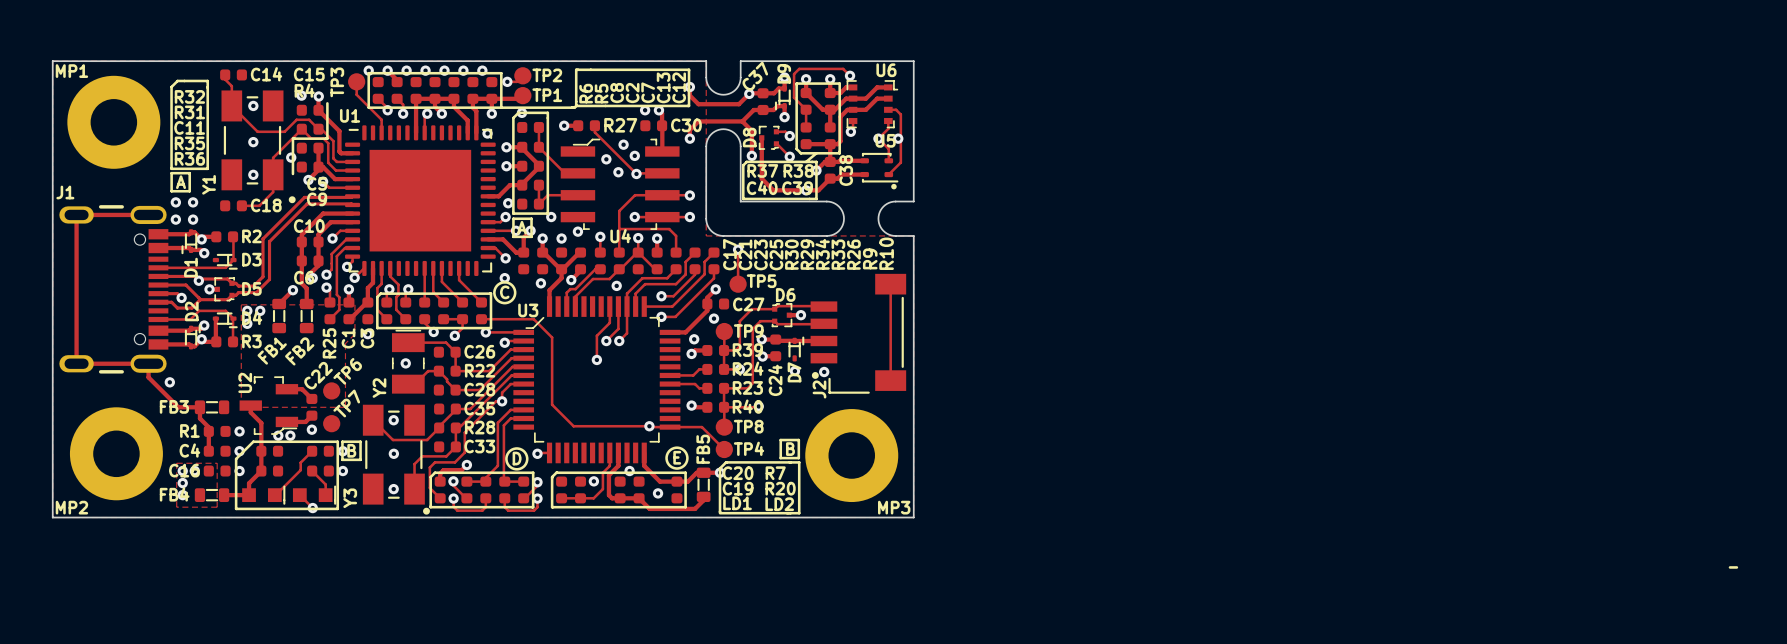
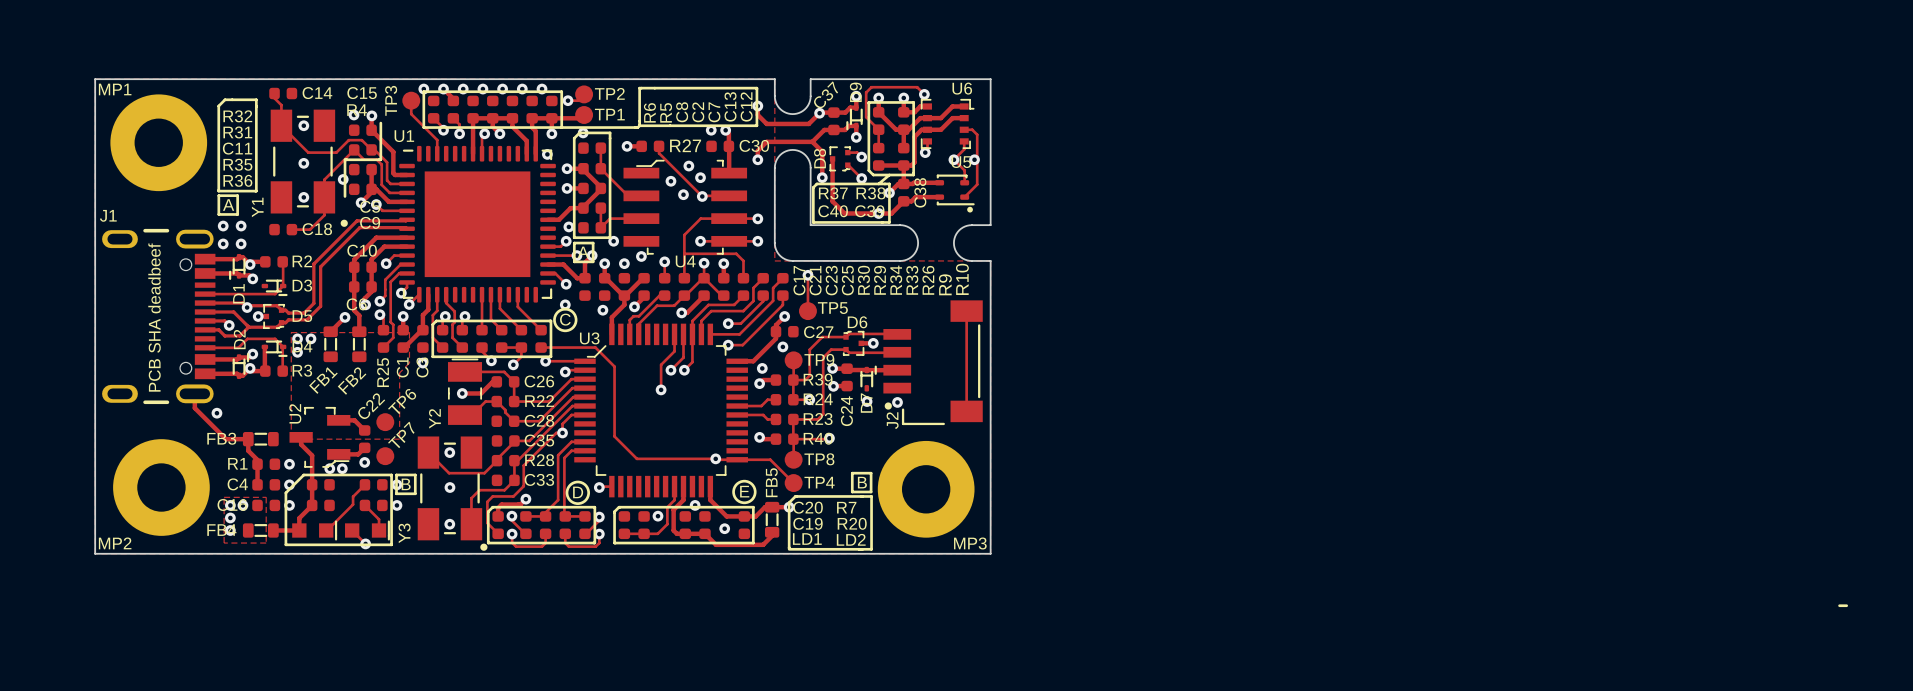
track: (148, 214) (76, 214) (76, 363) (148, 363) -> none
track: none -> (704, 295) (687, 312) (681, 312)
text: none -> PCB SHA deadbeef (154, 317)
track: none -> (496, 381) (492, 381) (481, 393) (462, 393)

